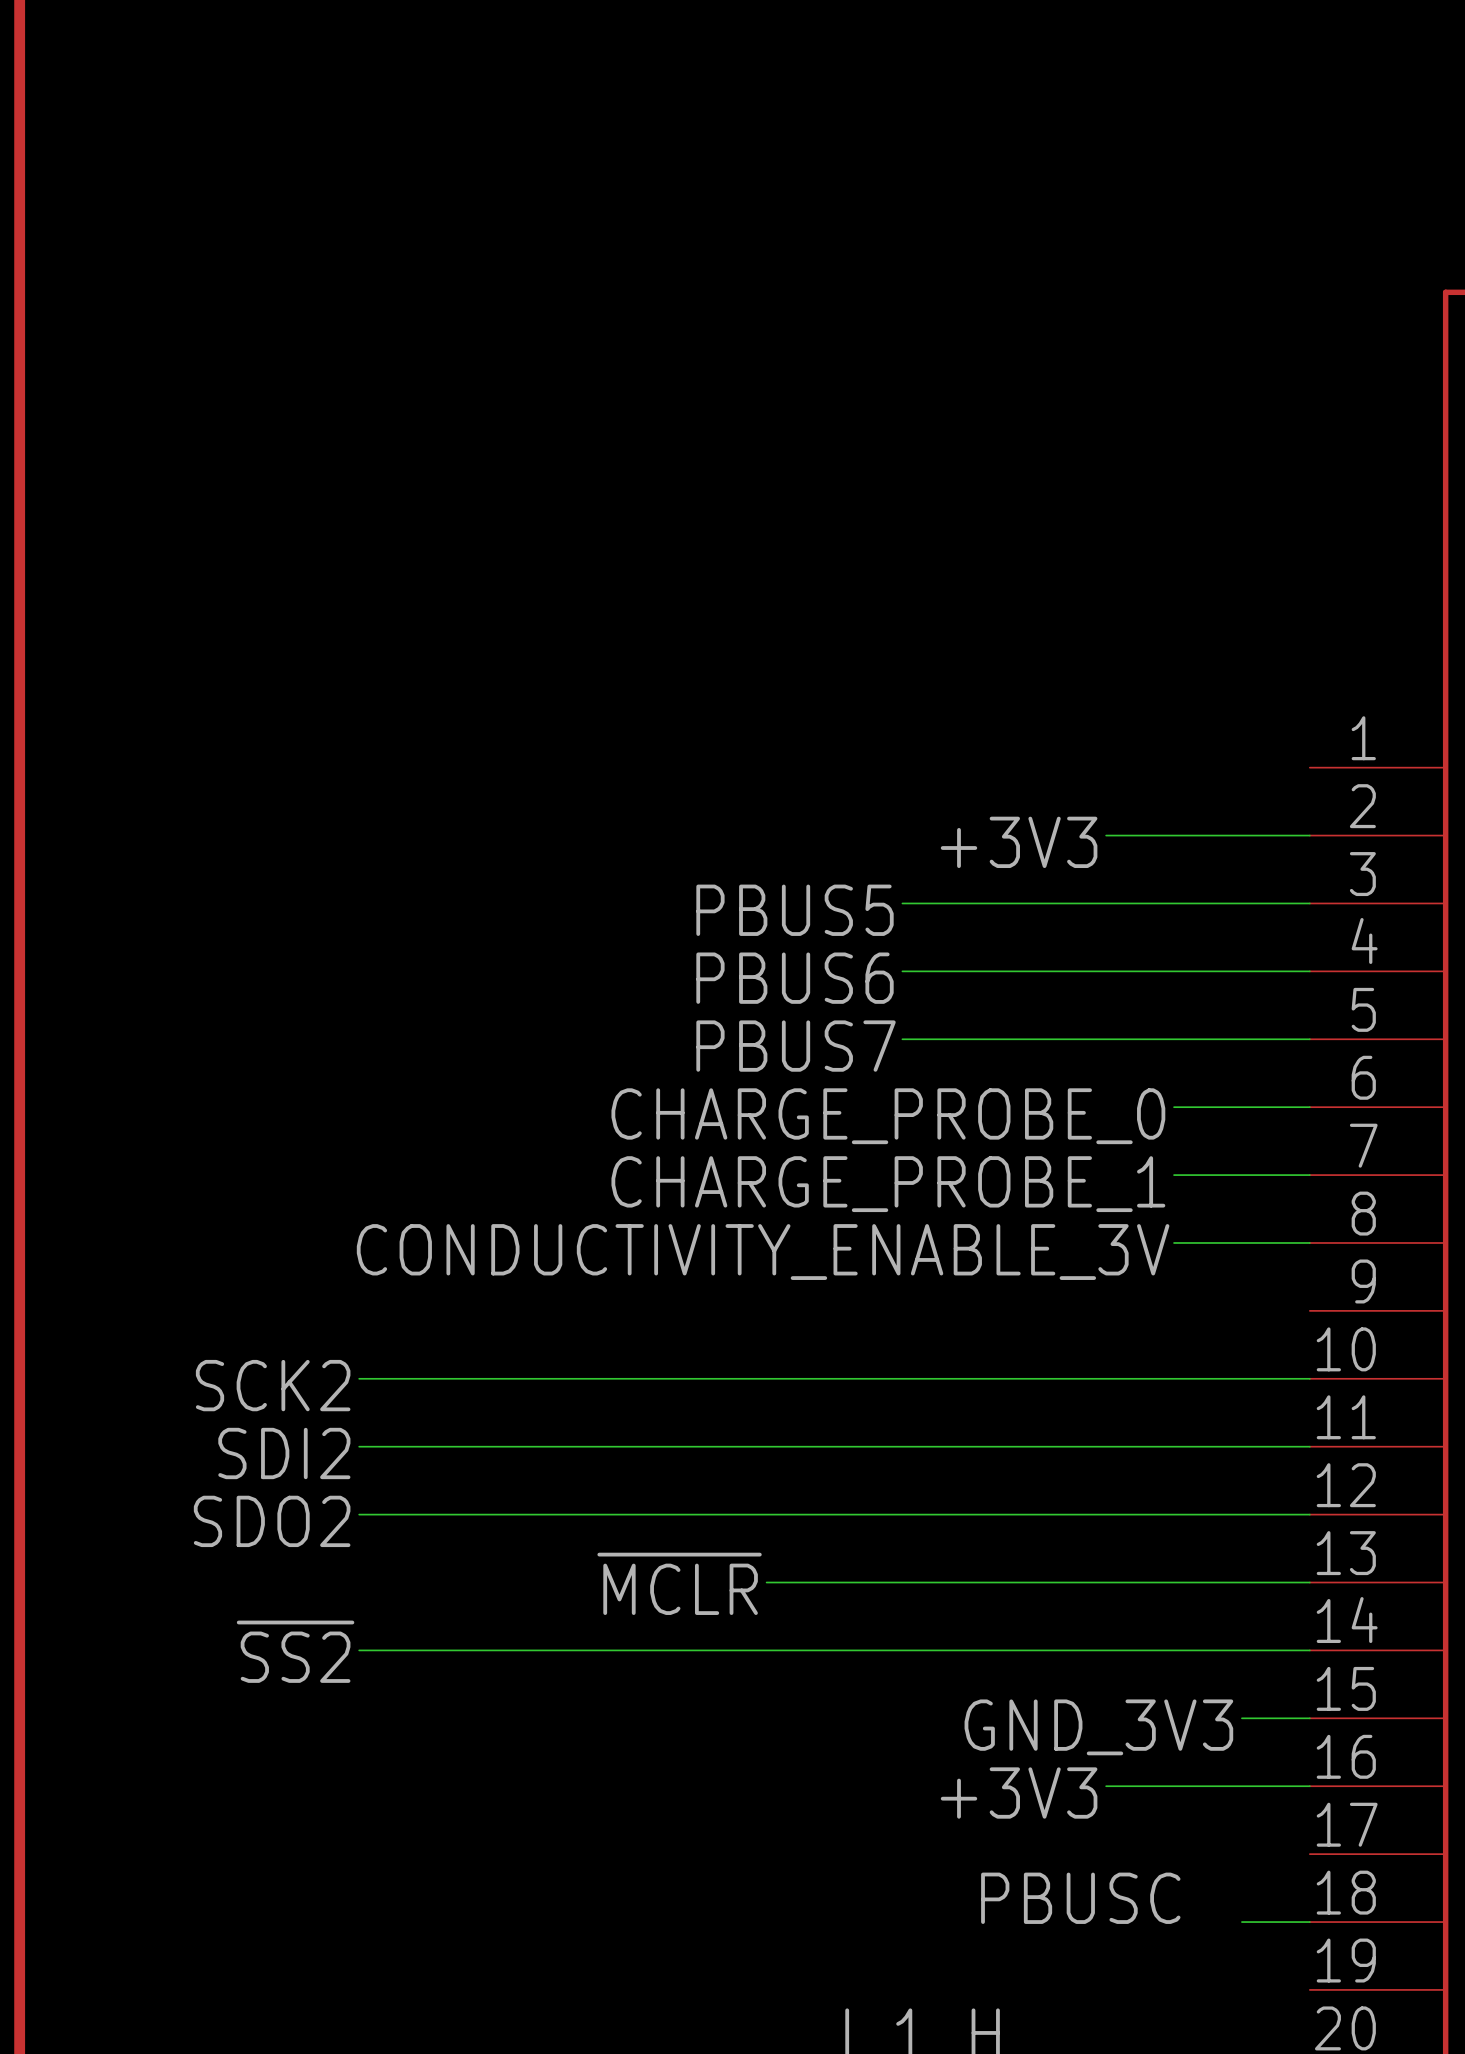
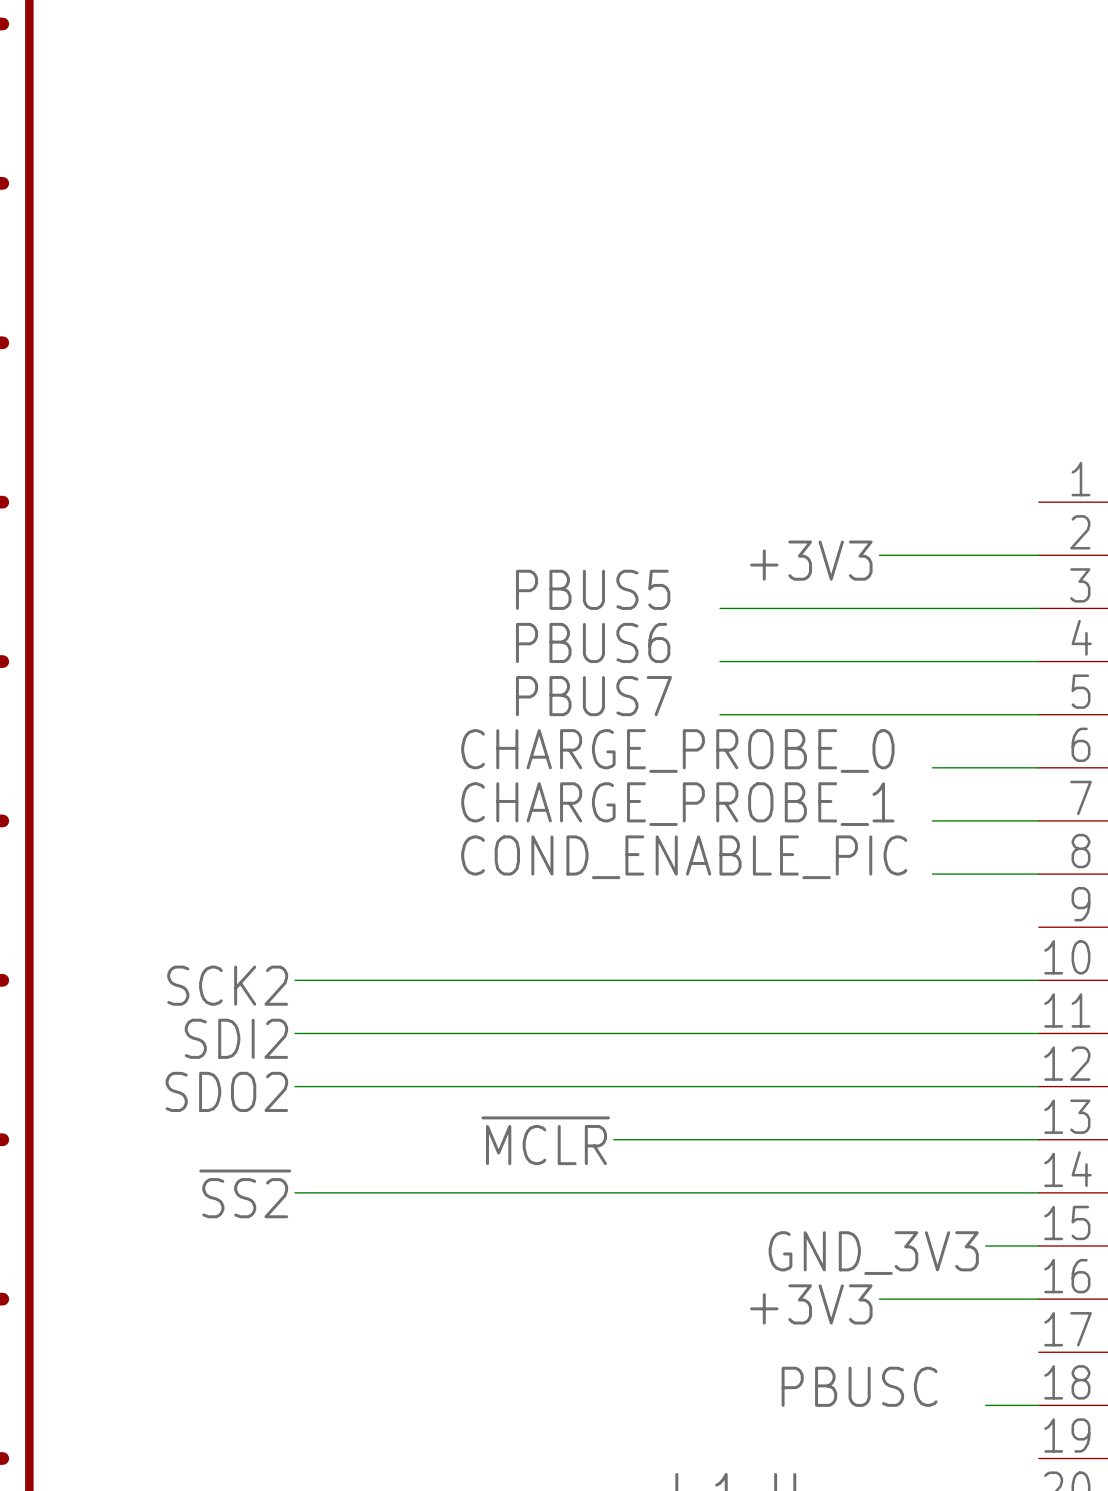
label position: PBUS5 (795, 910) -> PBUS5 (593, 589)
label position: PBUS6 (795, 978) -> PBUS6 (593, 642)
label position: PBUS7 (796, 1046) -> PBUS7 (593, 696)
label position: CHARGE_PROBE_0 (888, 1116) -> CHARGE_PROBE_0 (677, 750)
label position: CHARGE_PROBE_1 (888, 1184) -> CHARGE_PROBE_1 (677, 804)
label: CONDUCTIVITY_ENABLE_3V (763, 1252) -> COND_ENABLE_PIC (684, 857)

